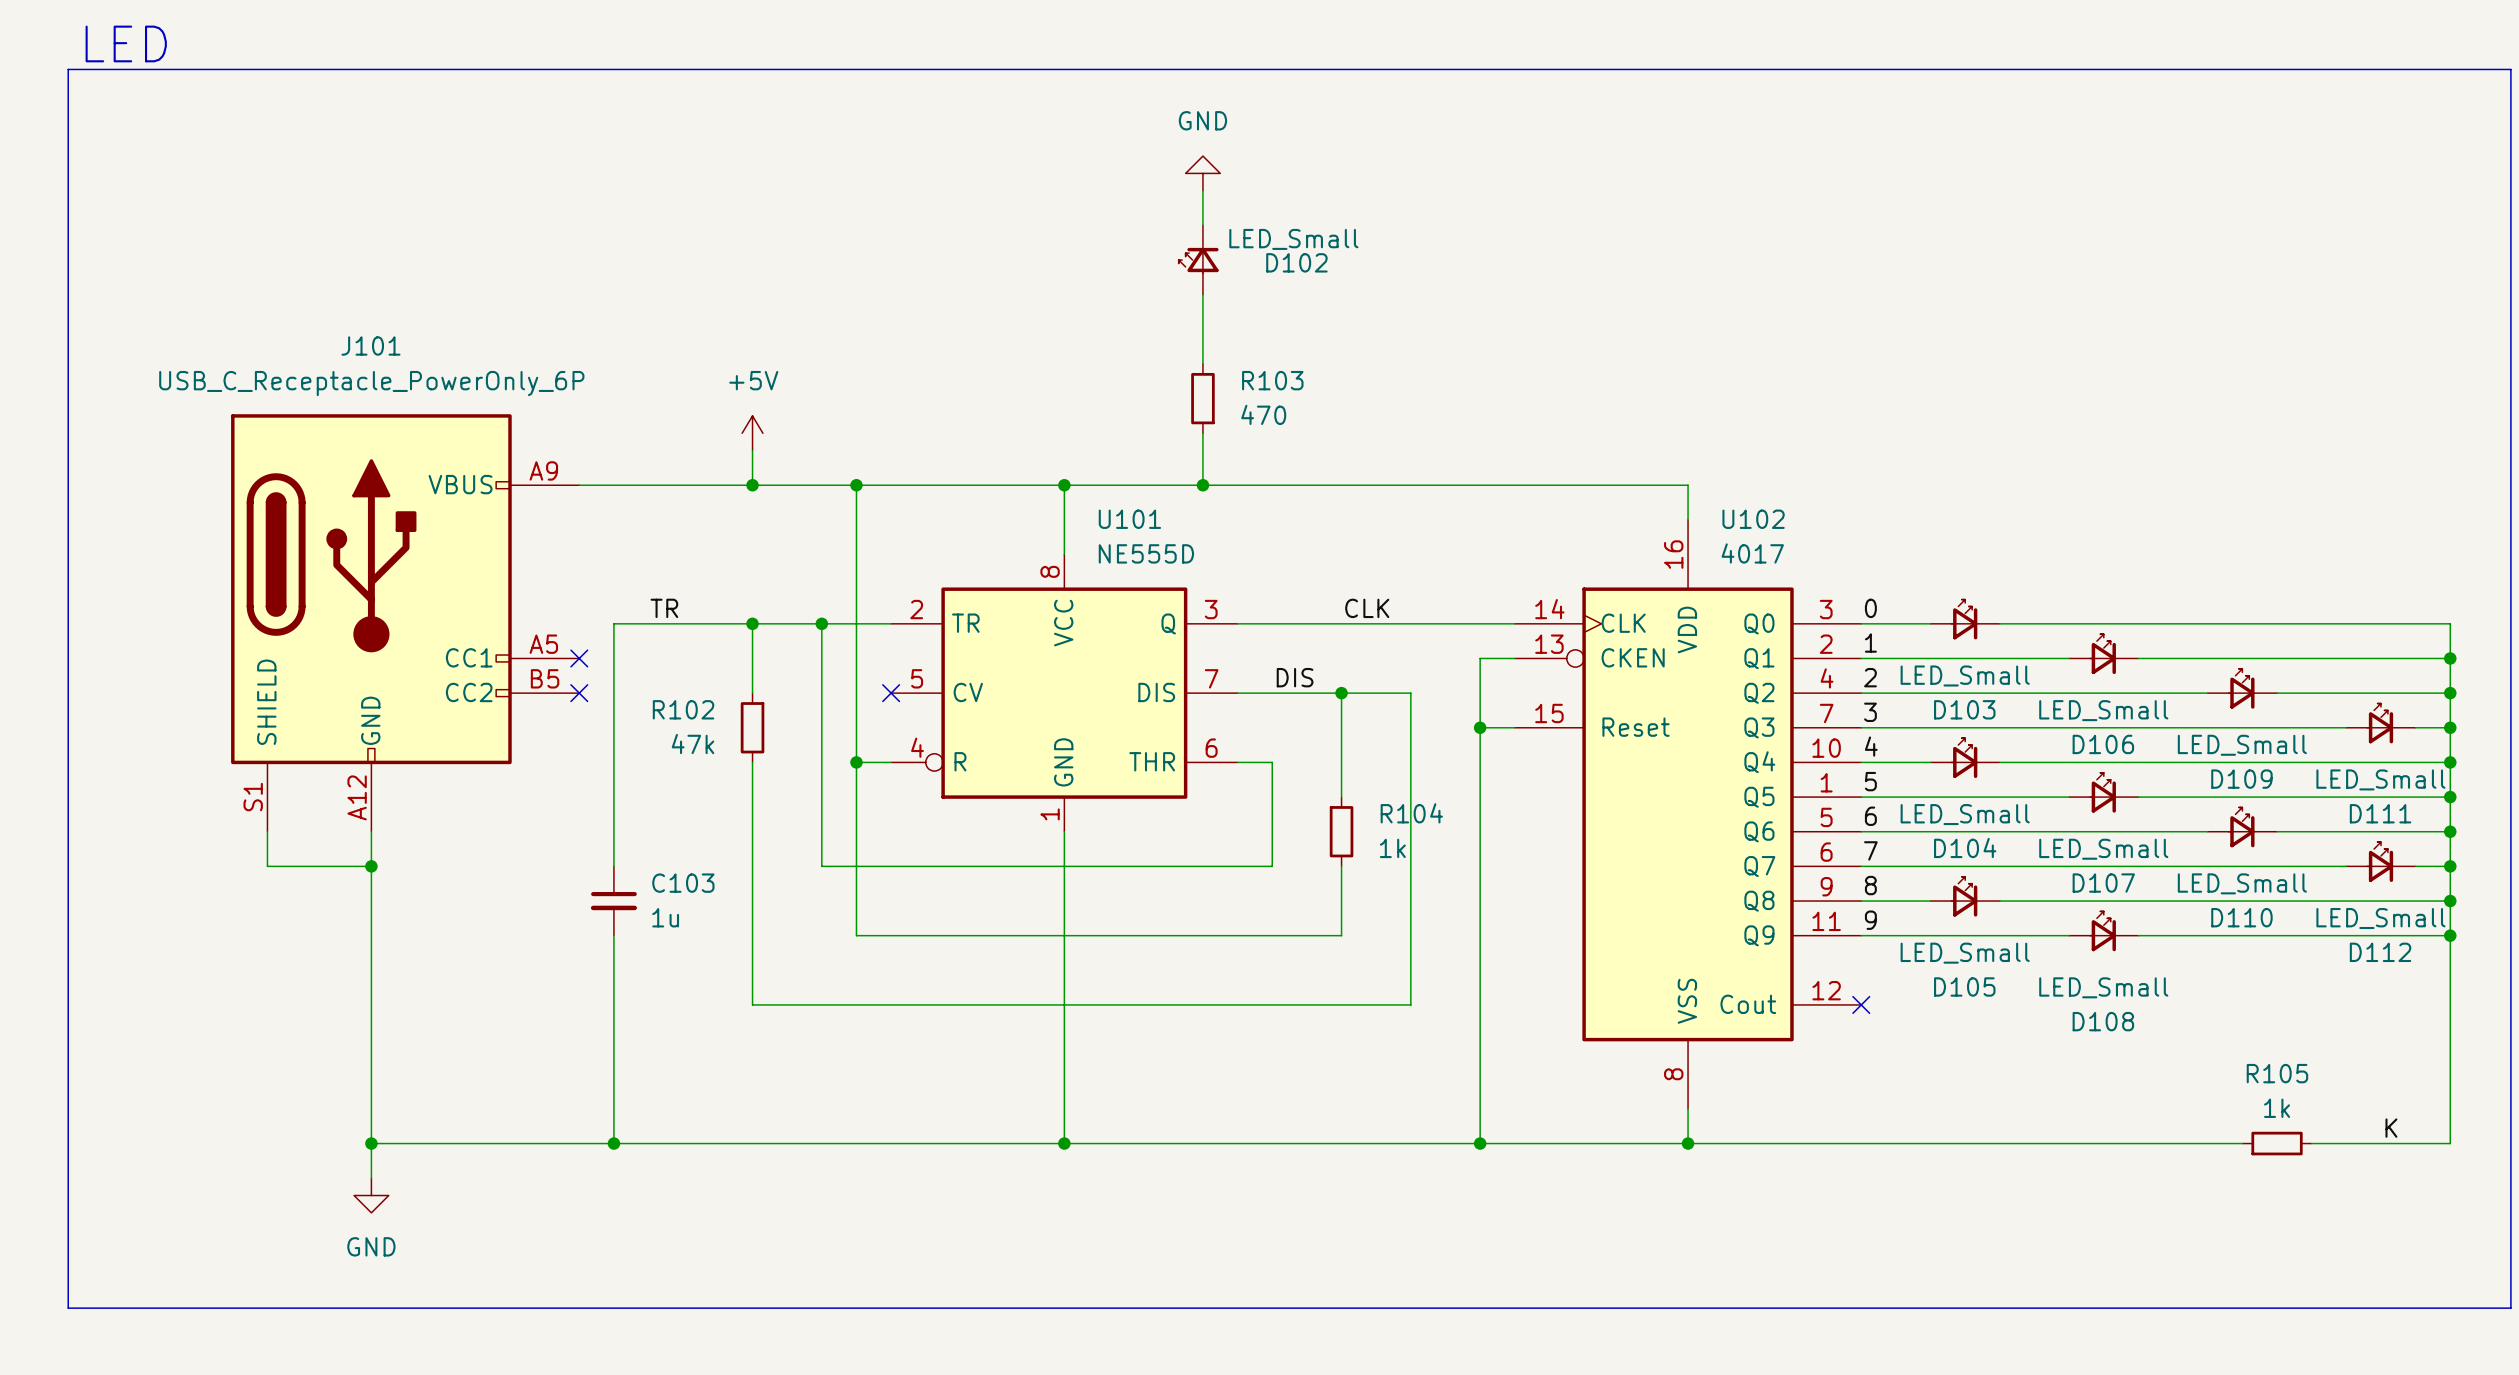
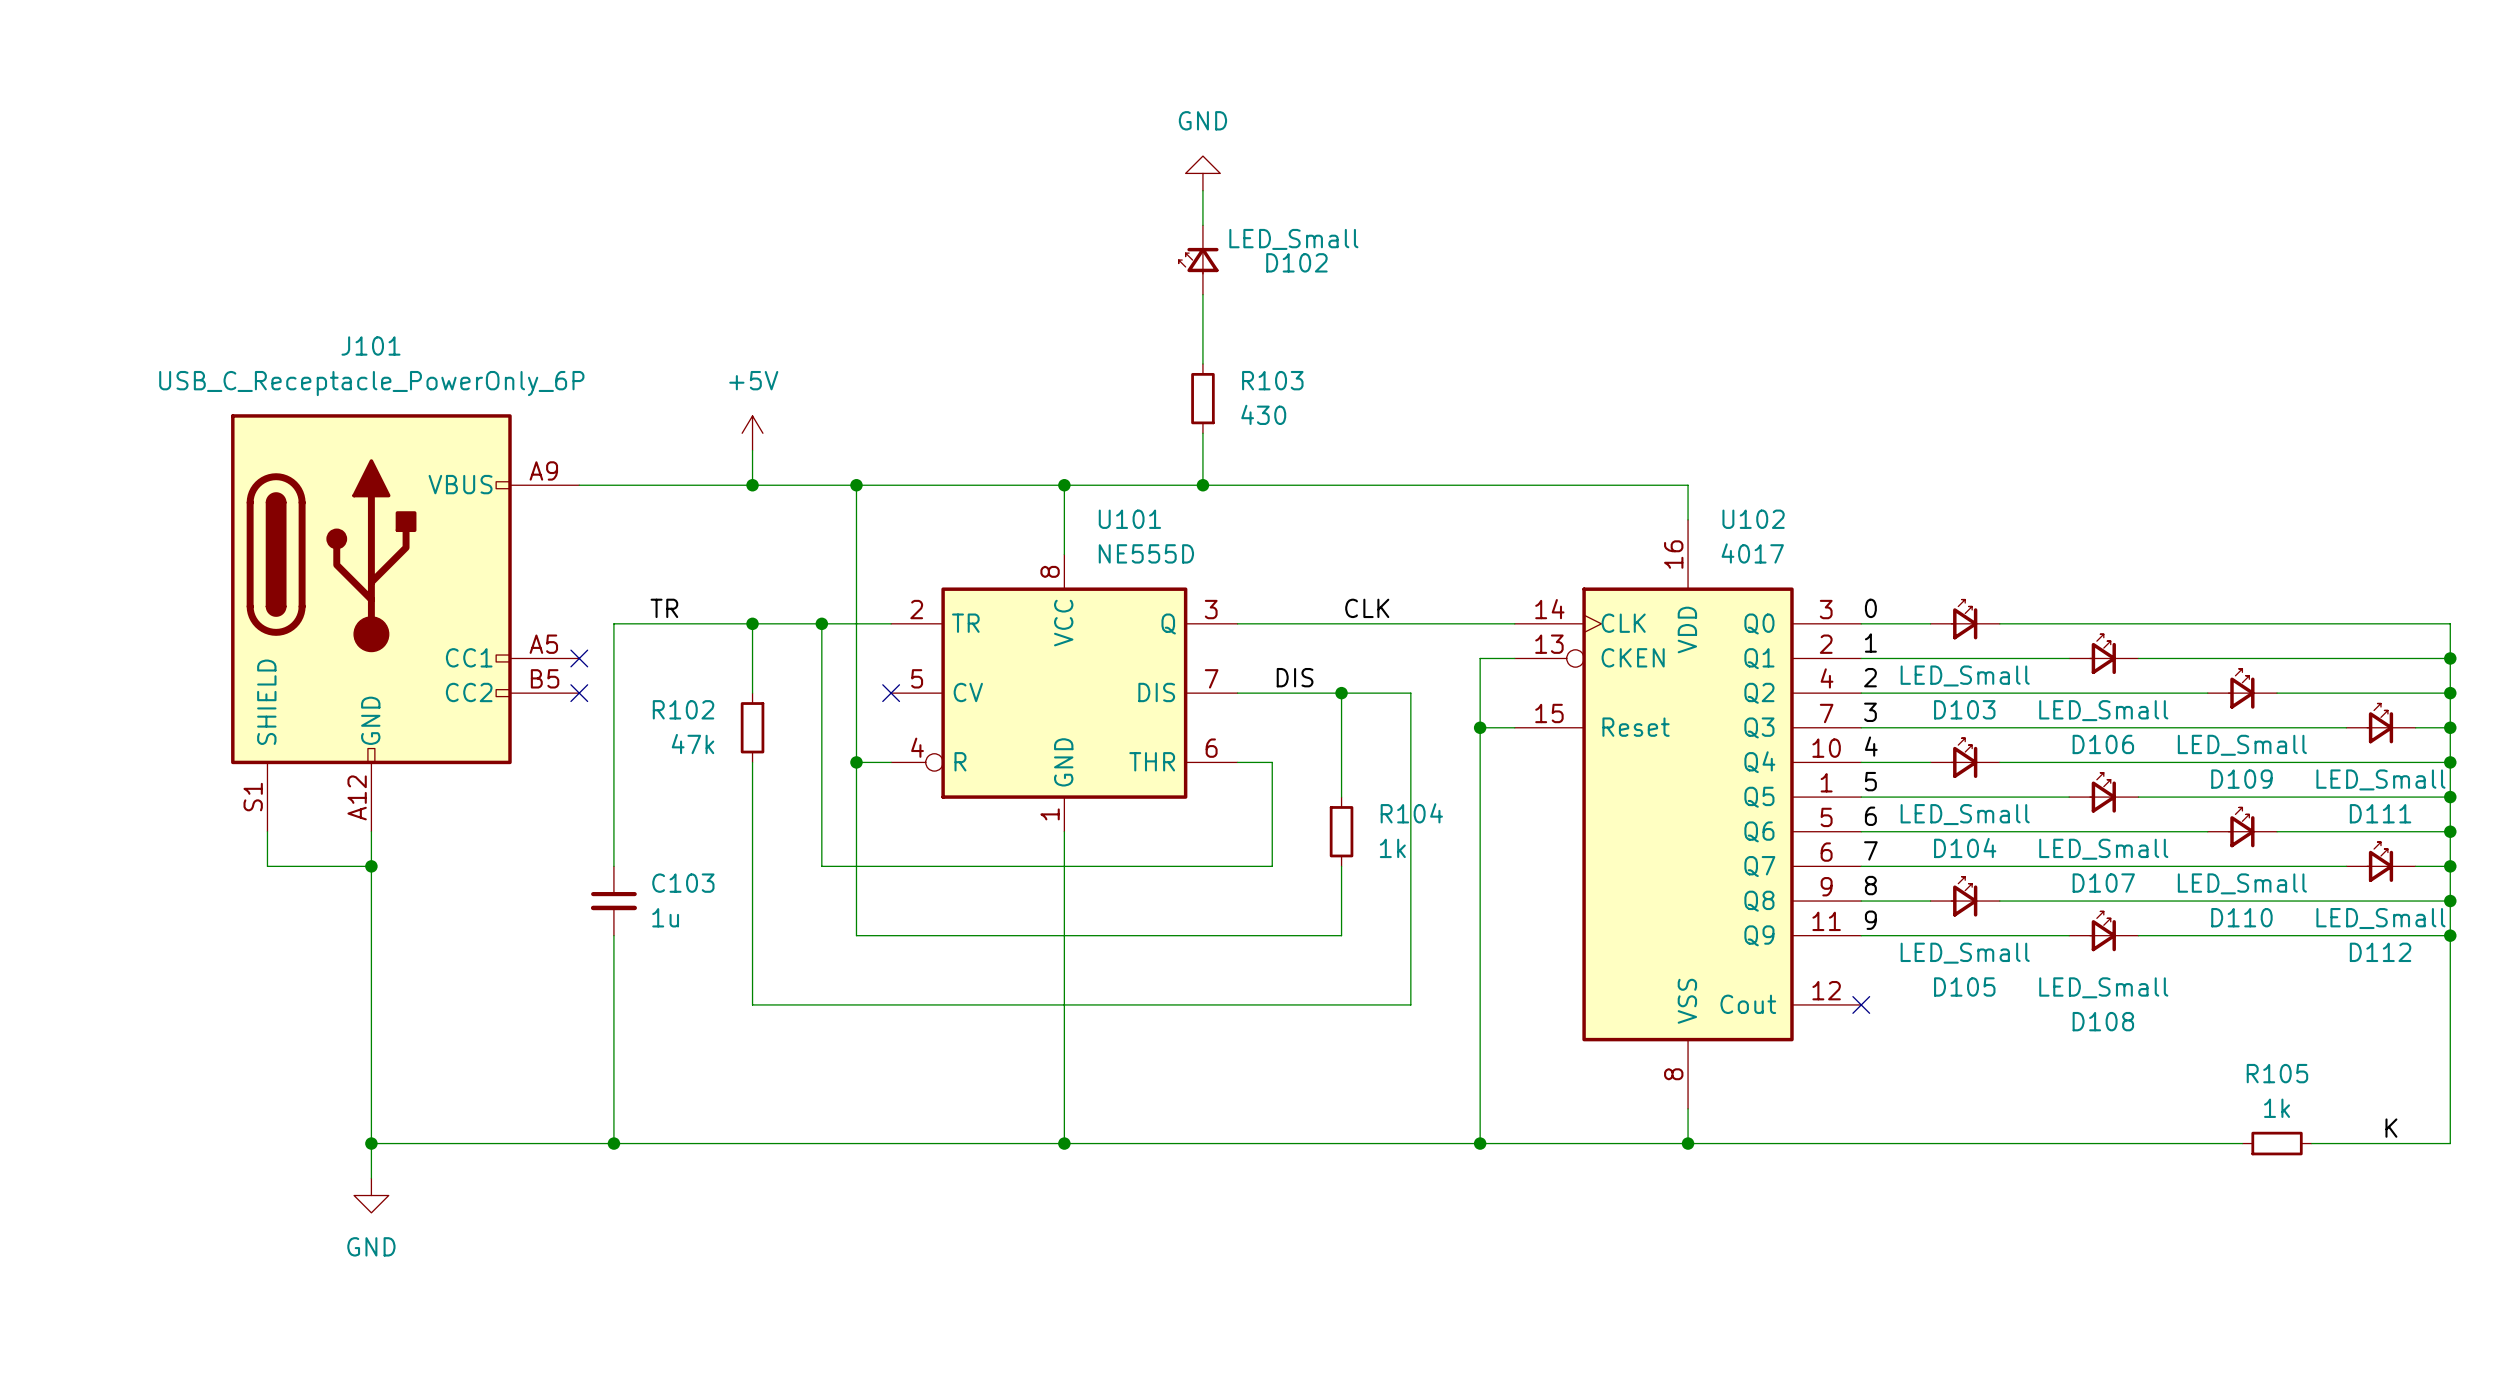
text: LED (126, 43) -> none
line: (68, 69) (2510, 69) (2510, 1308) (68, 1308) (68, 69) -> none
R103 value: 470 (1263, 414) -> 430 (1263, 414)

